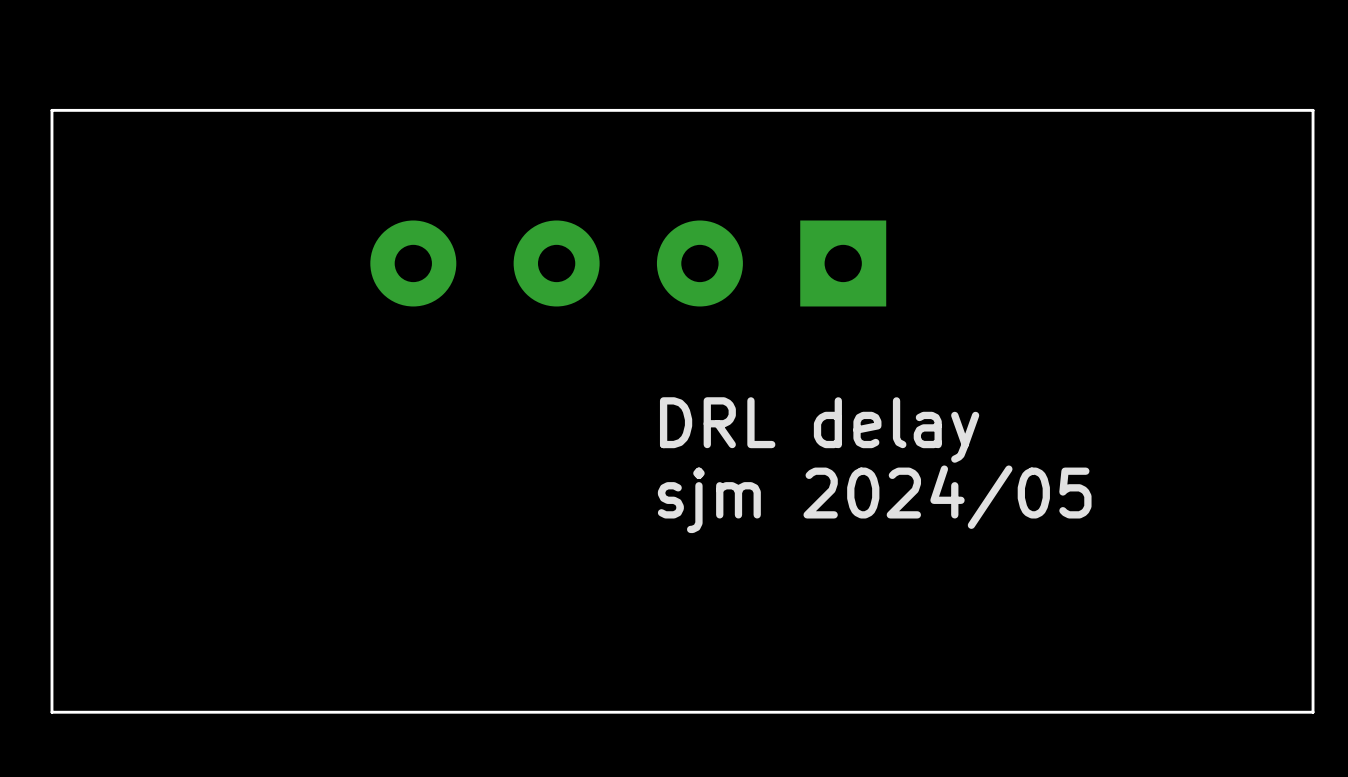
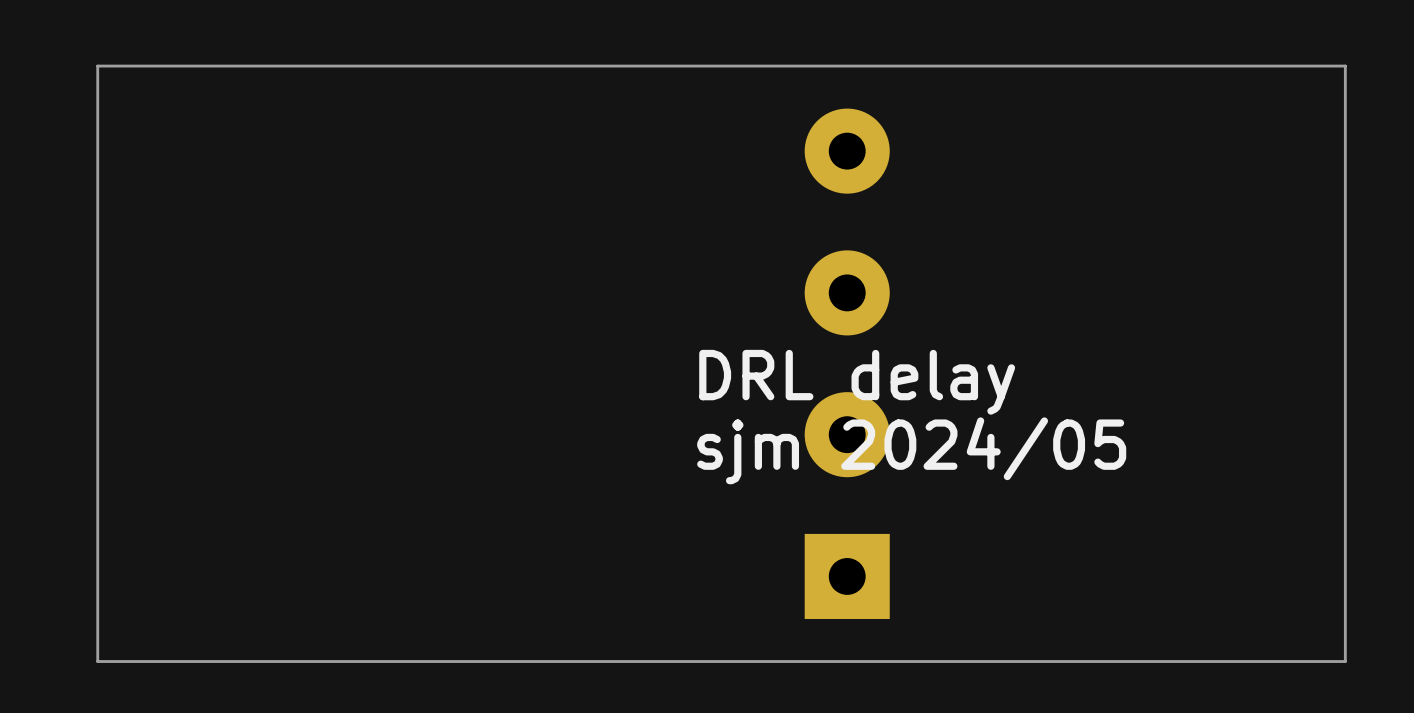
part rotation: 0° (628, 263) -> 90° clockwise (847, 363)

